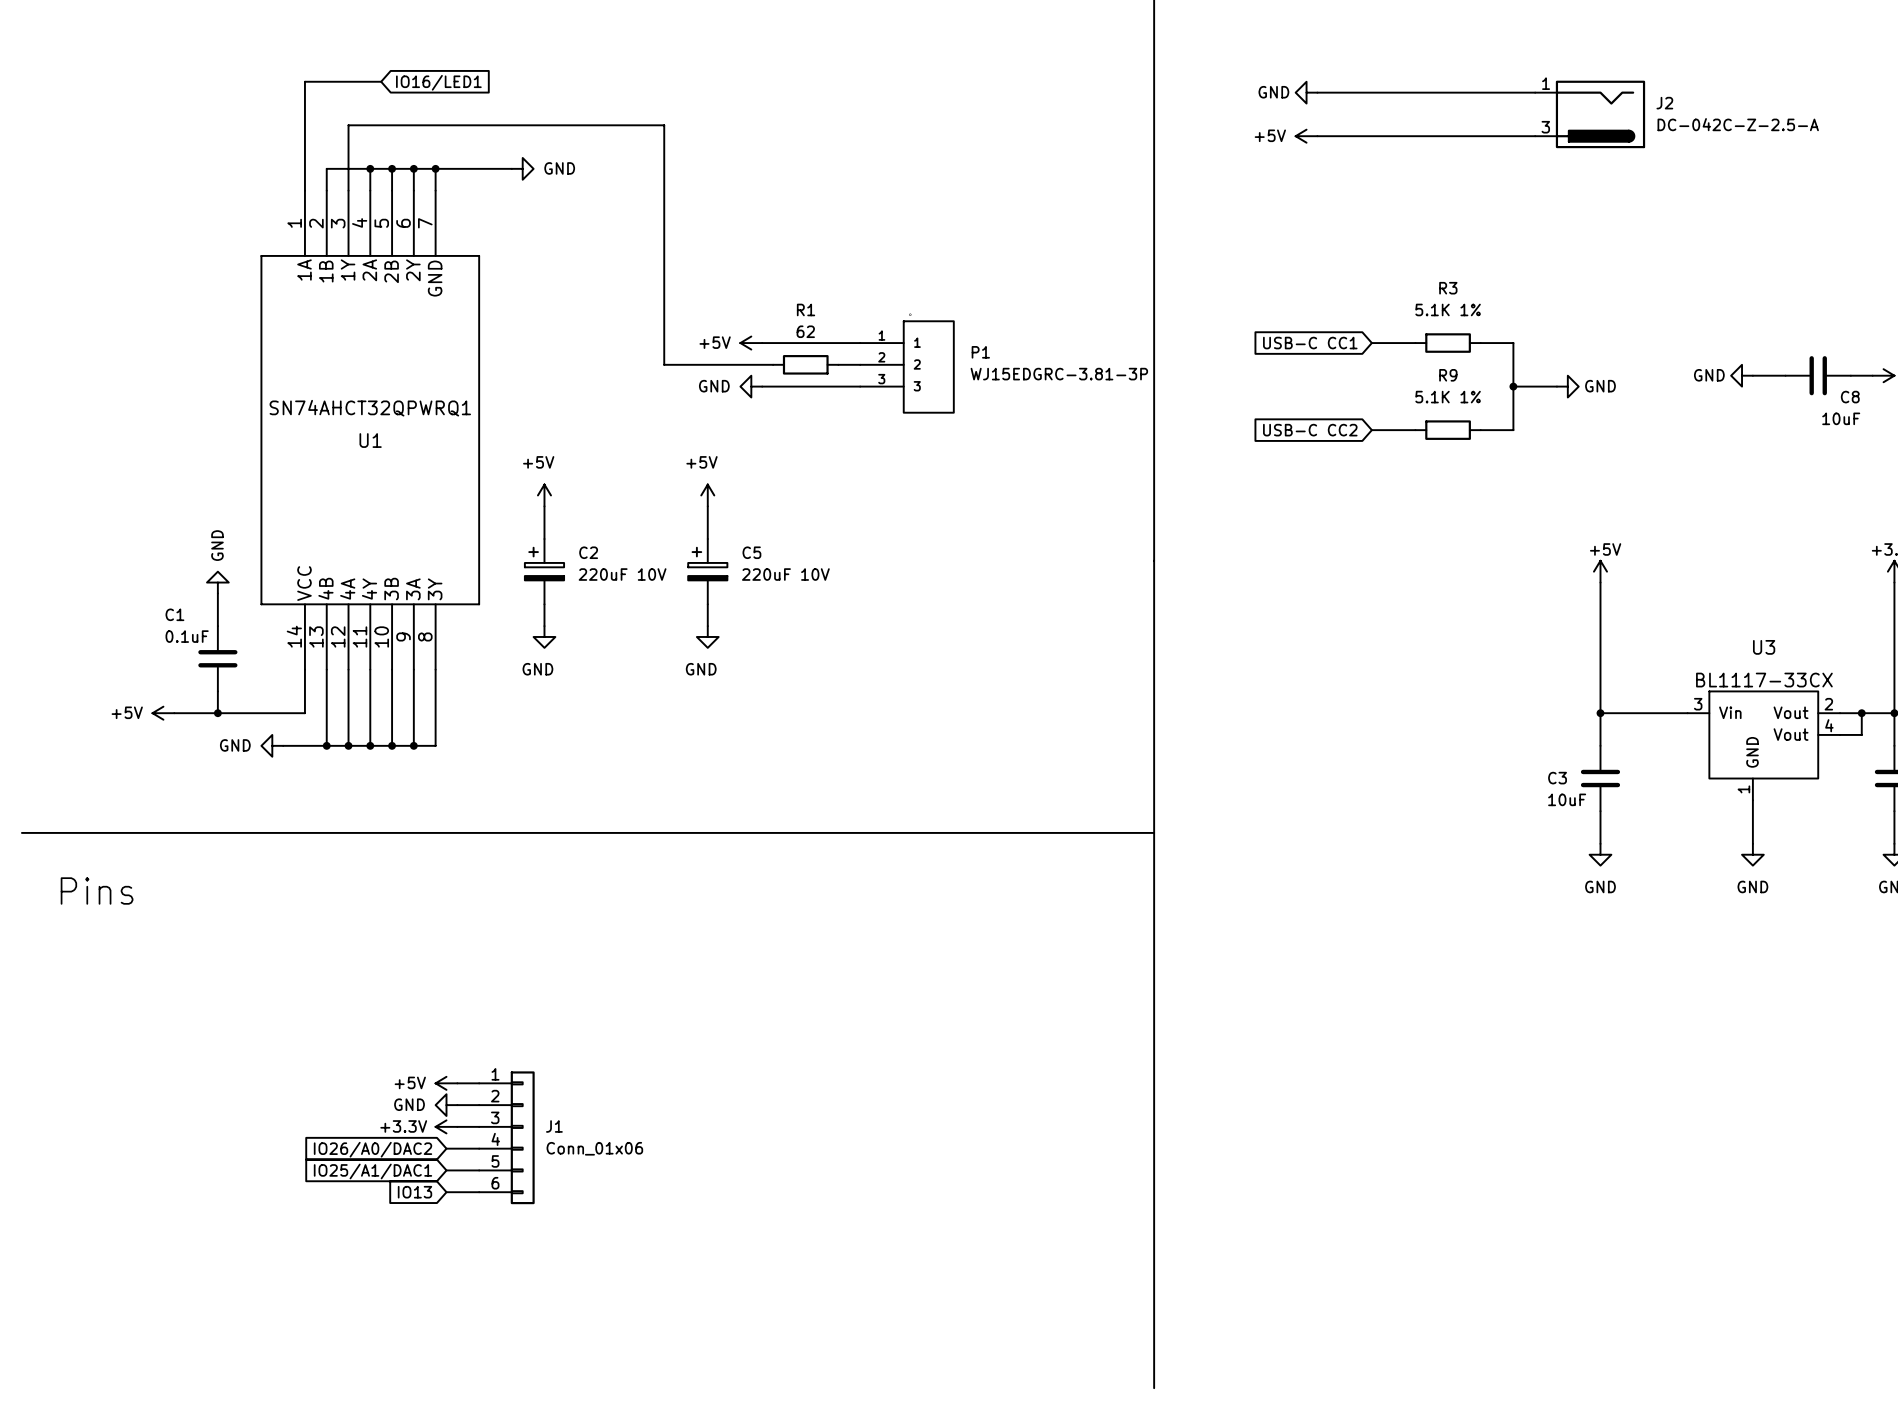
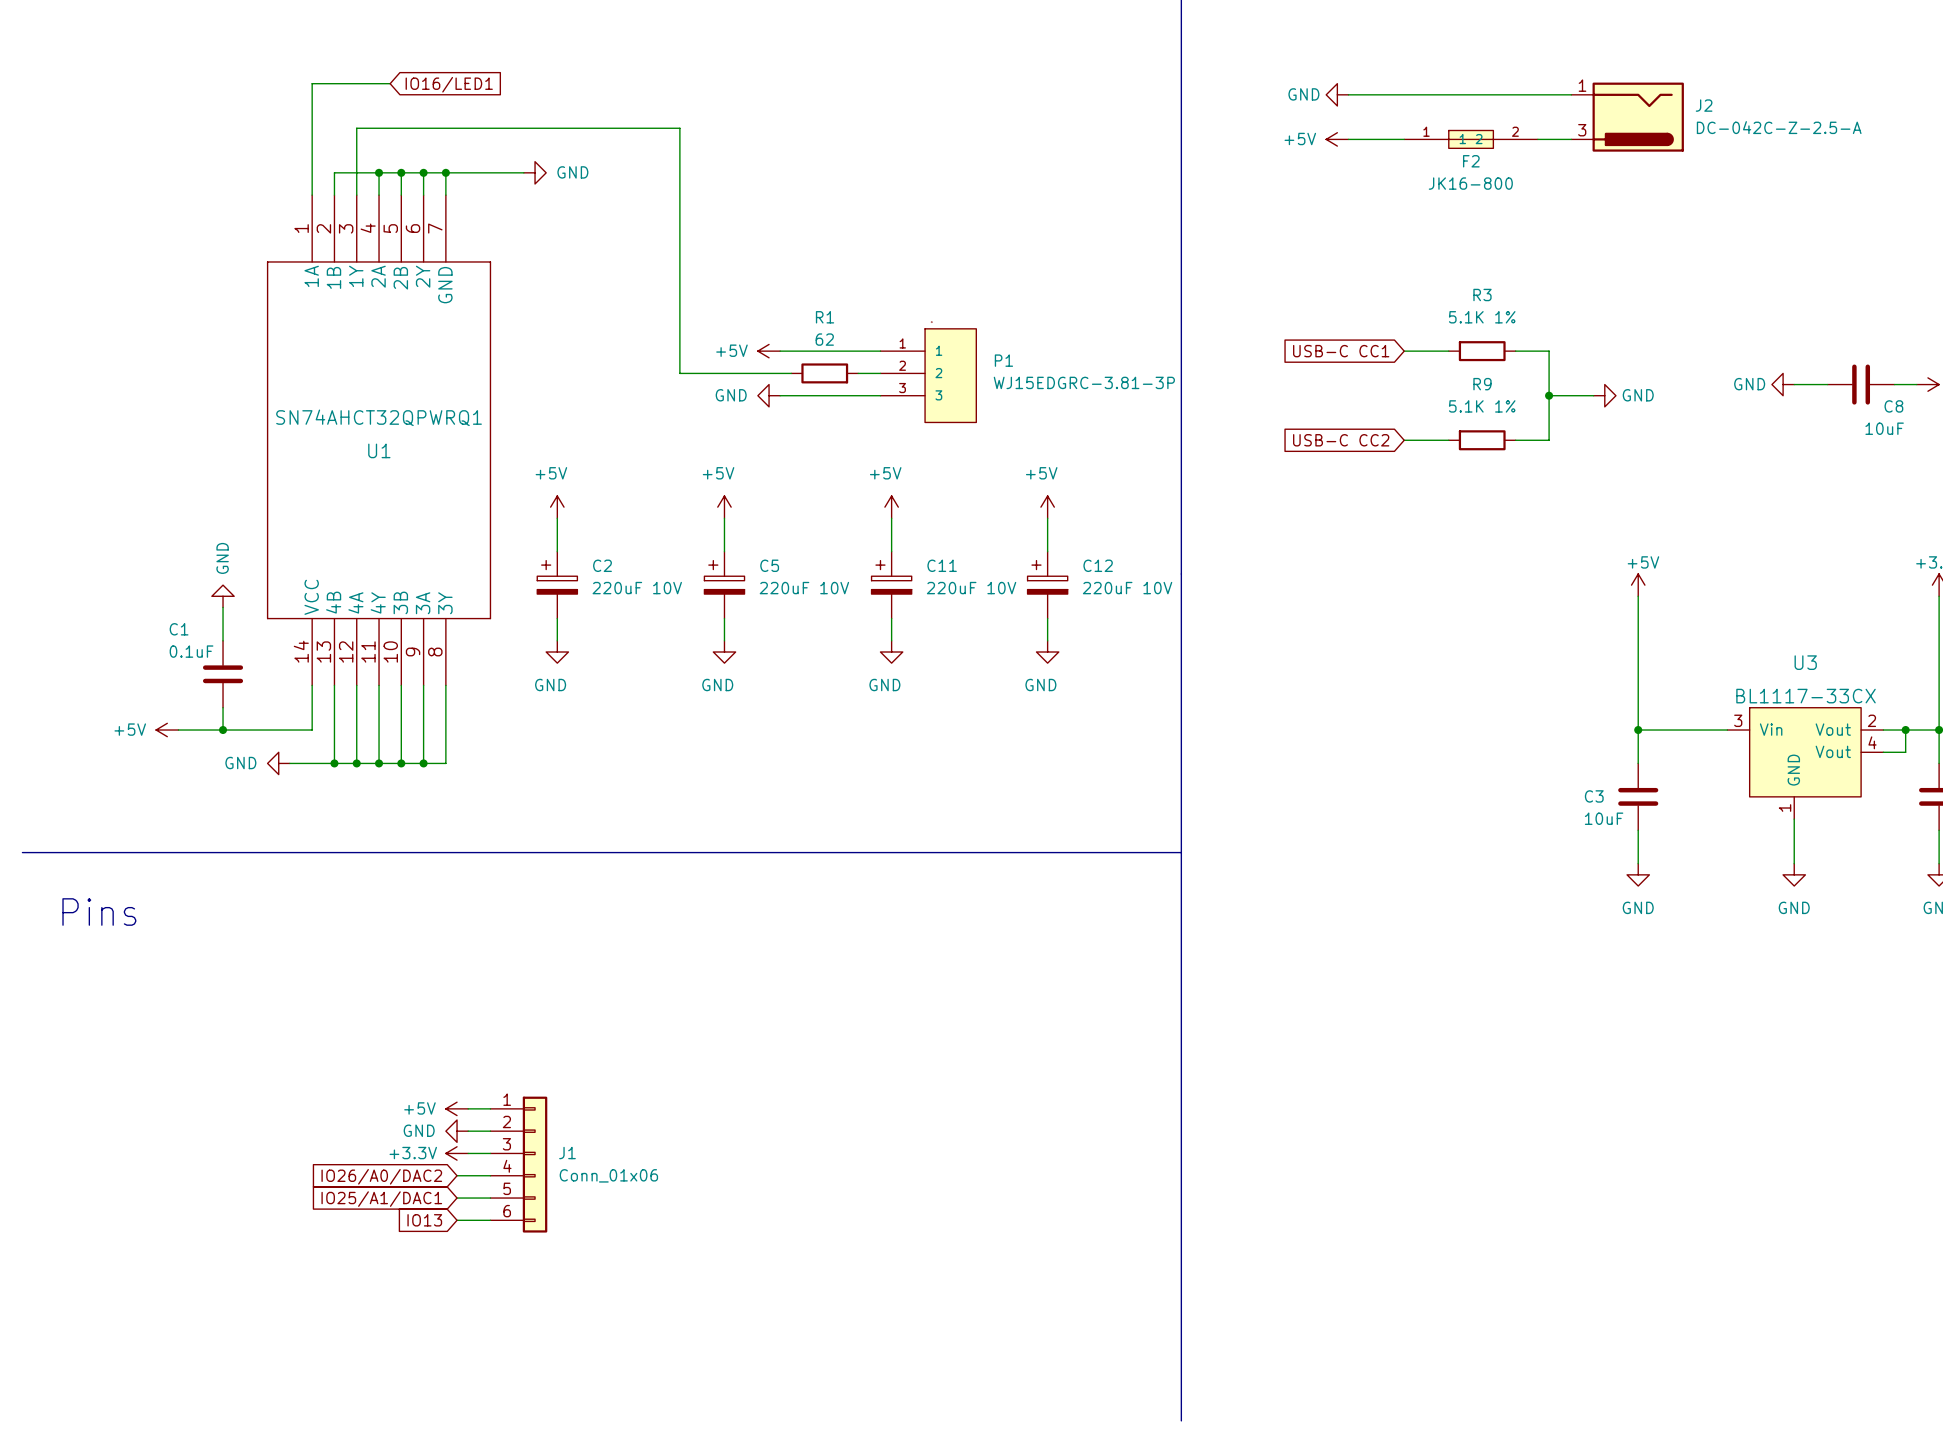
F2: none -> JK16-800 (1471, 139)
power symbol: none -> +5V (891, 507)
power symbol: none -> +5V (1047, 507)
wire: none -> (891, 518) (891, 551)
wire: none -> (1047, 518) (1047, 551)
C11: none -> 220uF 10V (891, 585)
C12: none -> 220uF 10V (1047, 585)
wire: none -> (891, 618) (891, 640)
wire: none -> (1047, 618) (1047, 640)
power symbol: none -> GND (891, 652)
power symbol: none -> GND (1047, 652)

